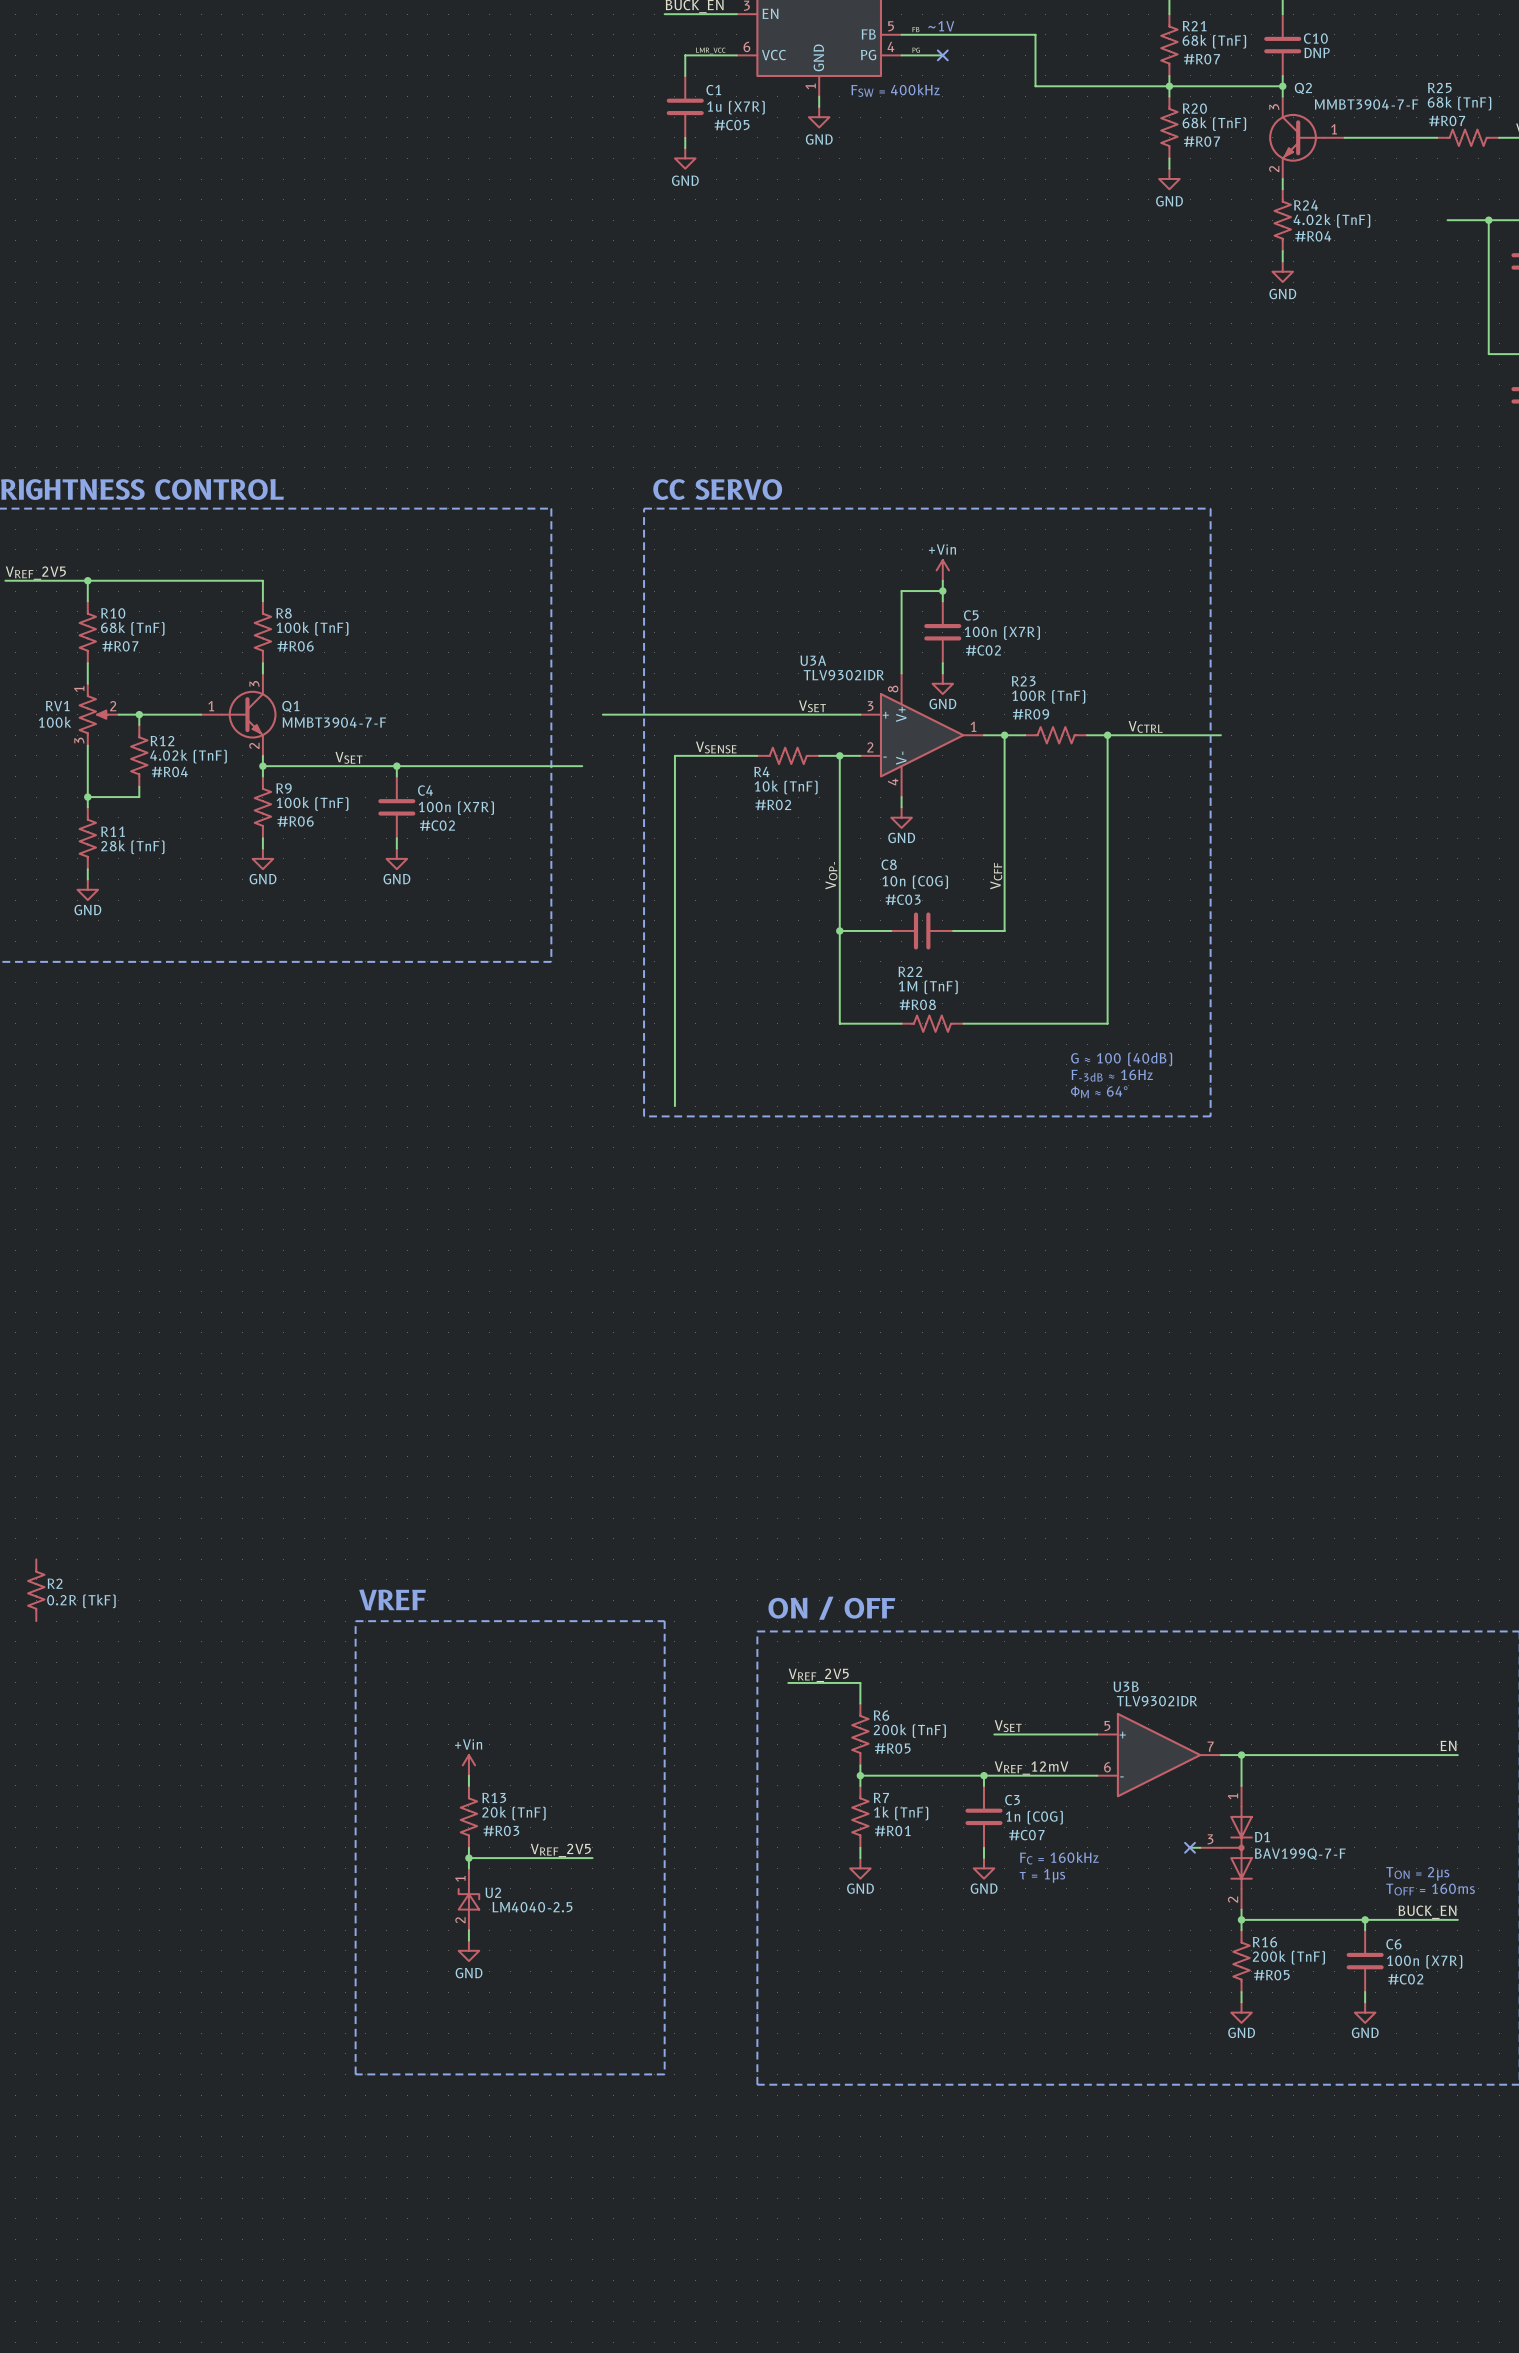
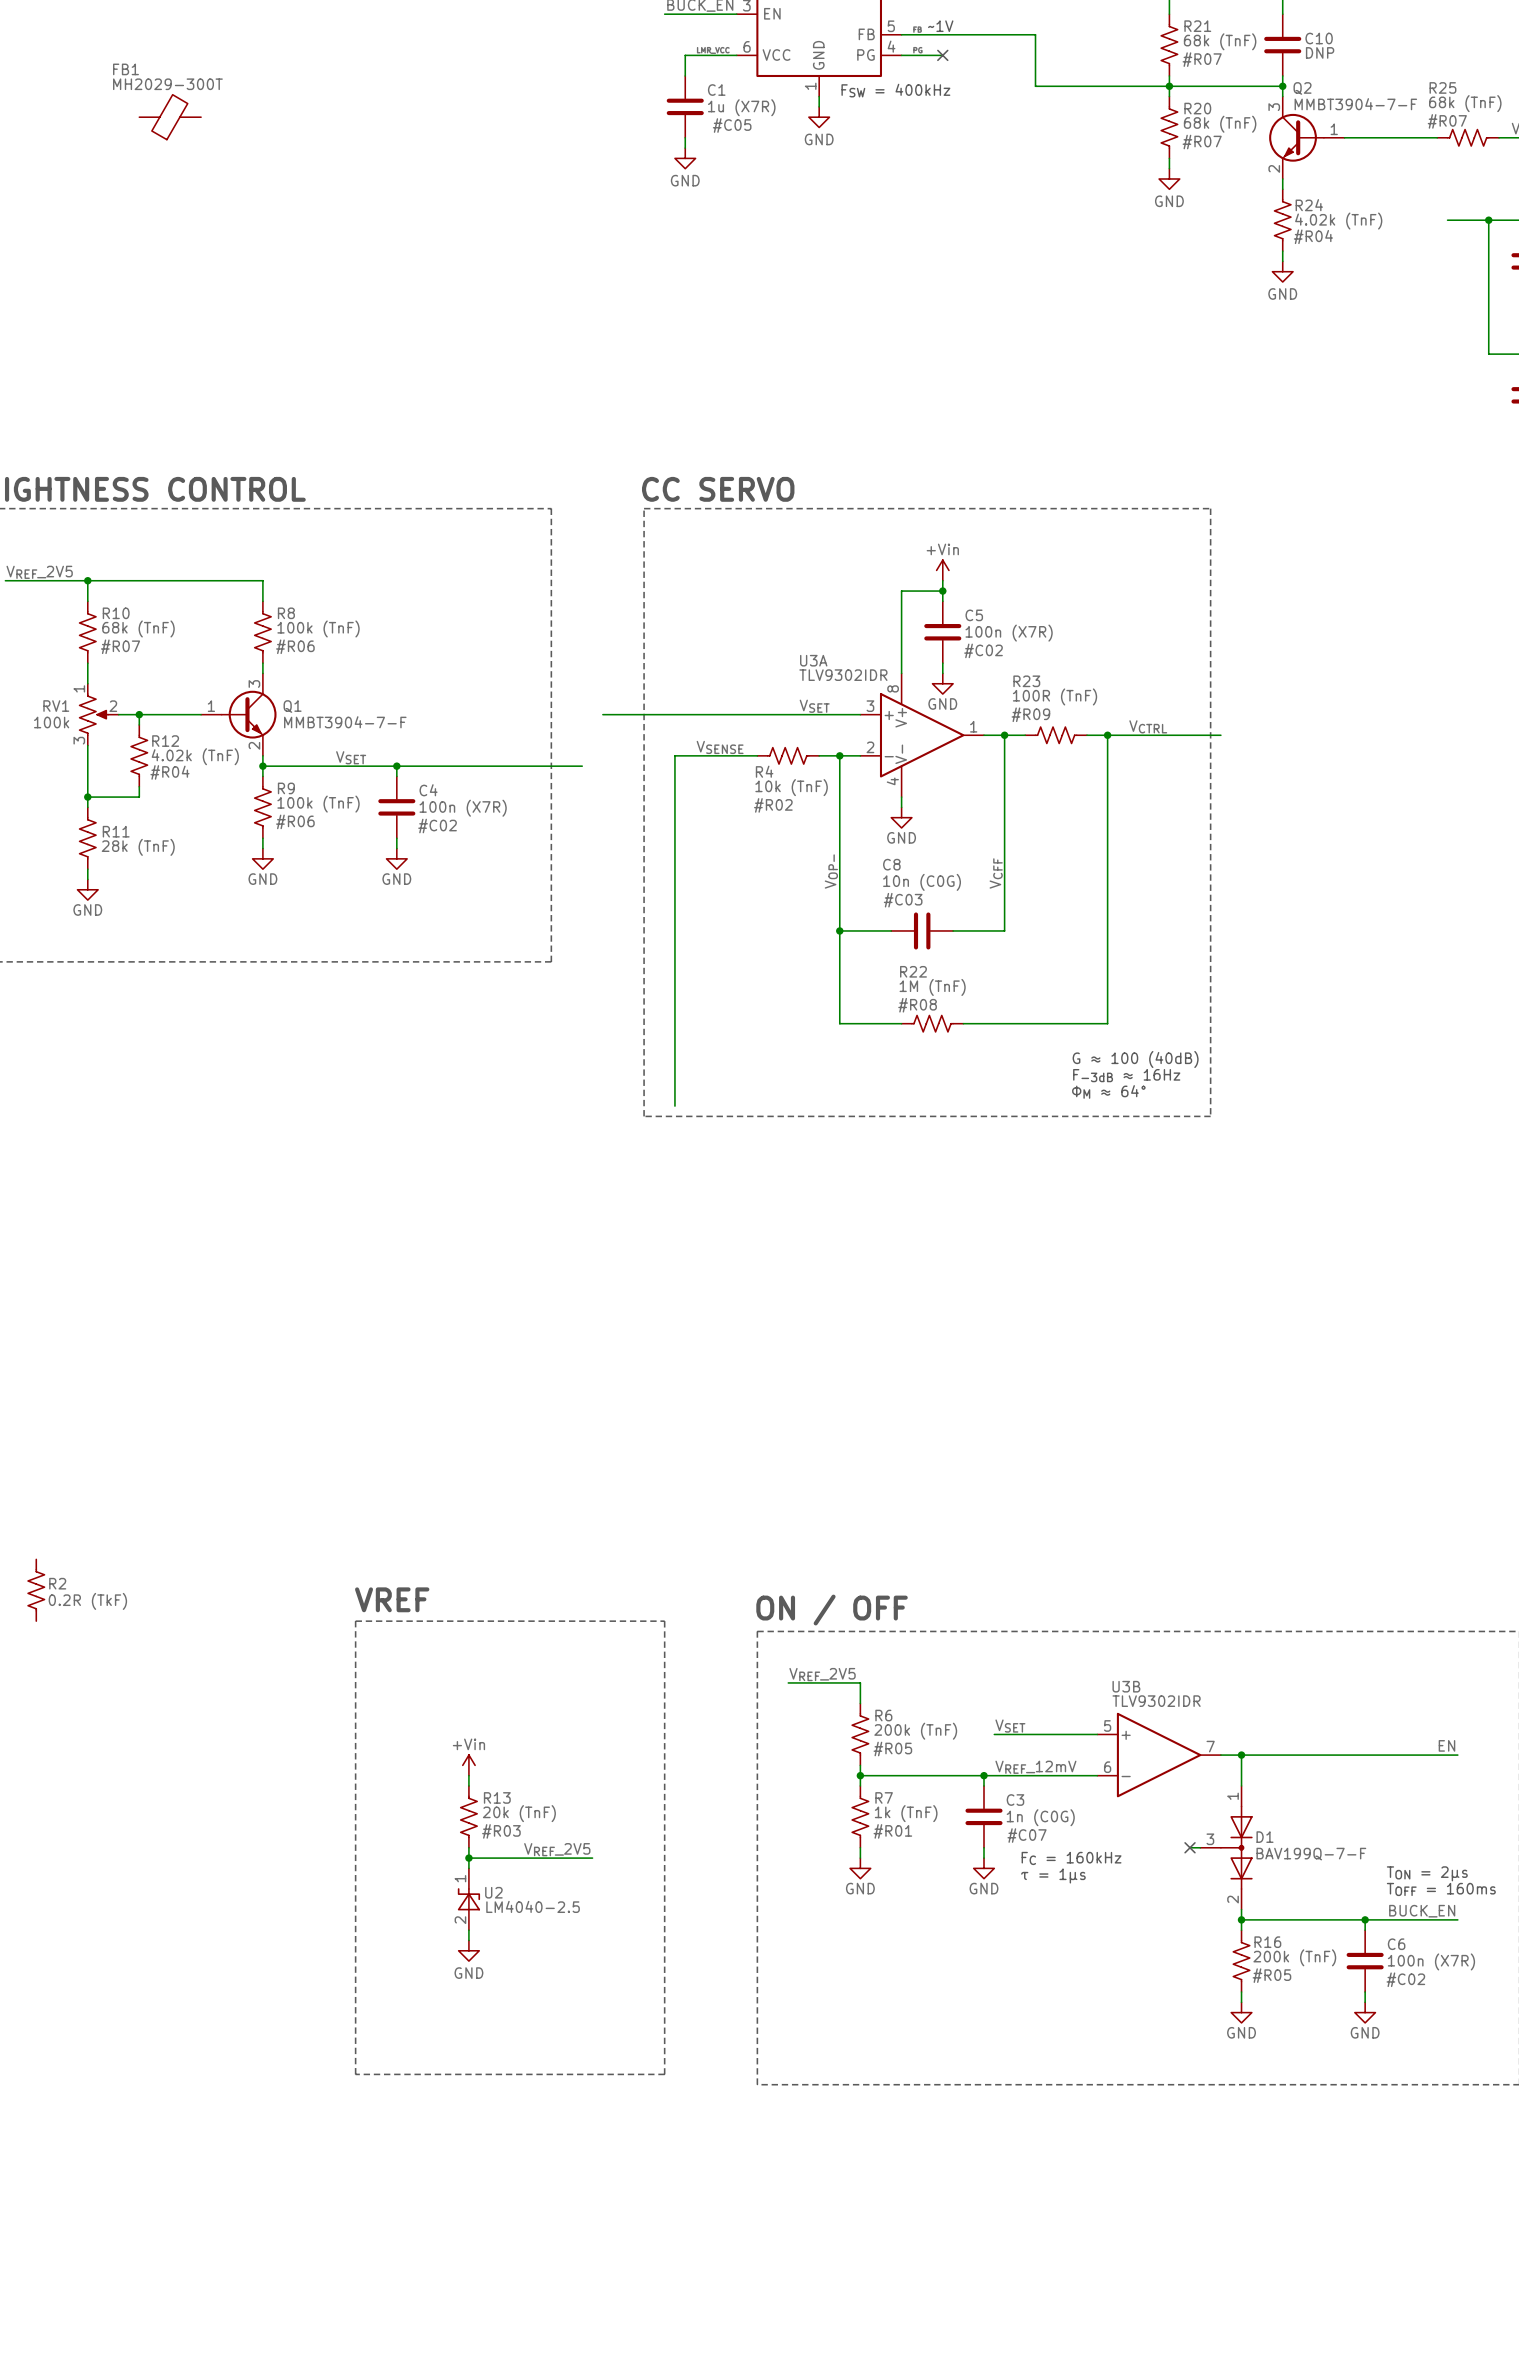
FB1: none -> MH2029-300T (170, 117)

